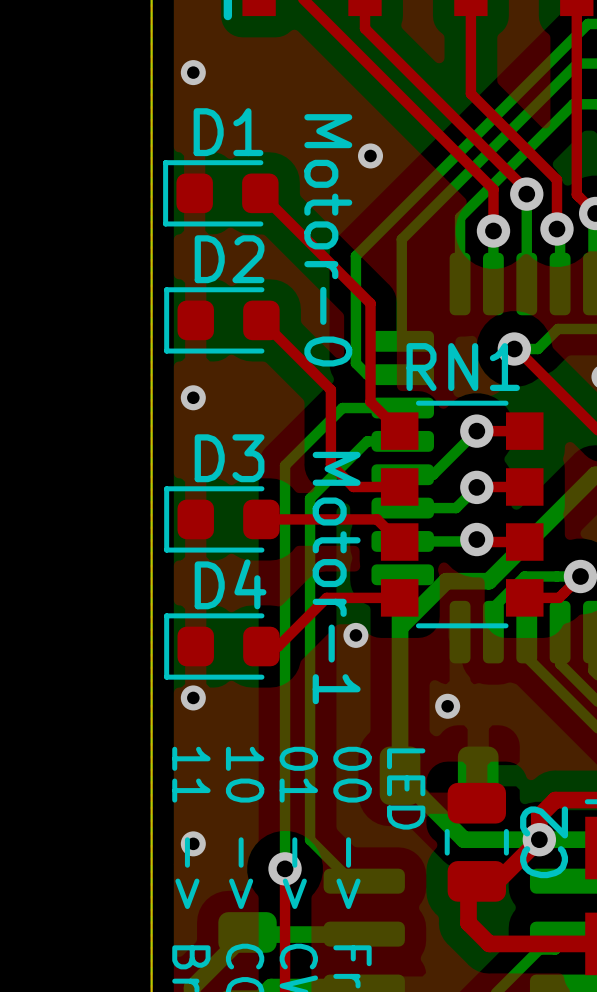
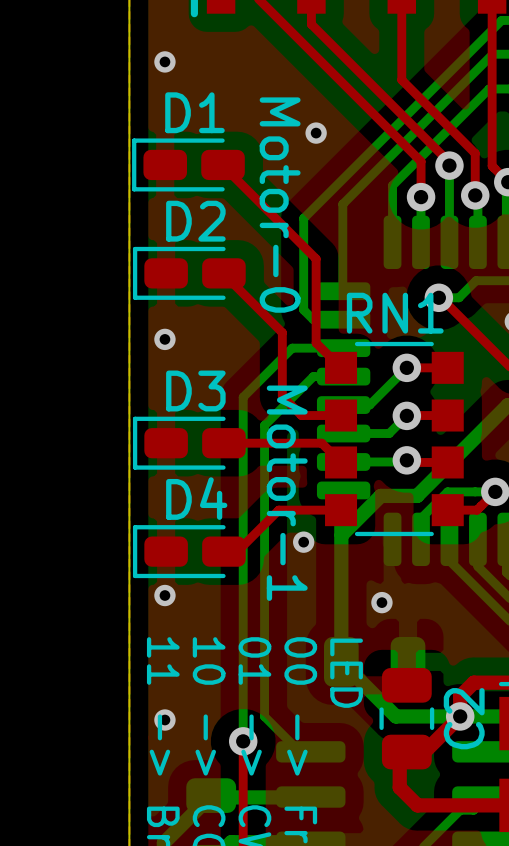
D1 footprint: [163, 160, 279, 227] -> [132, 138, 245, 192]
D2 footprint: [164, 287, 280, 354] -> [132, 246, 246, 300]
D3 footprint: [164, 486, 280, 553] -> [132, 416, 246, 470]
D4 footprint: [164, 613, 280, 680] -> [132, 525, 246, 579]

